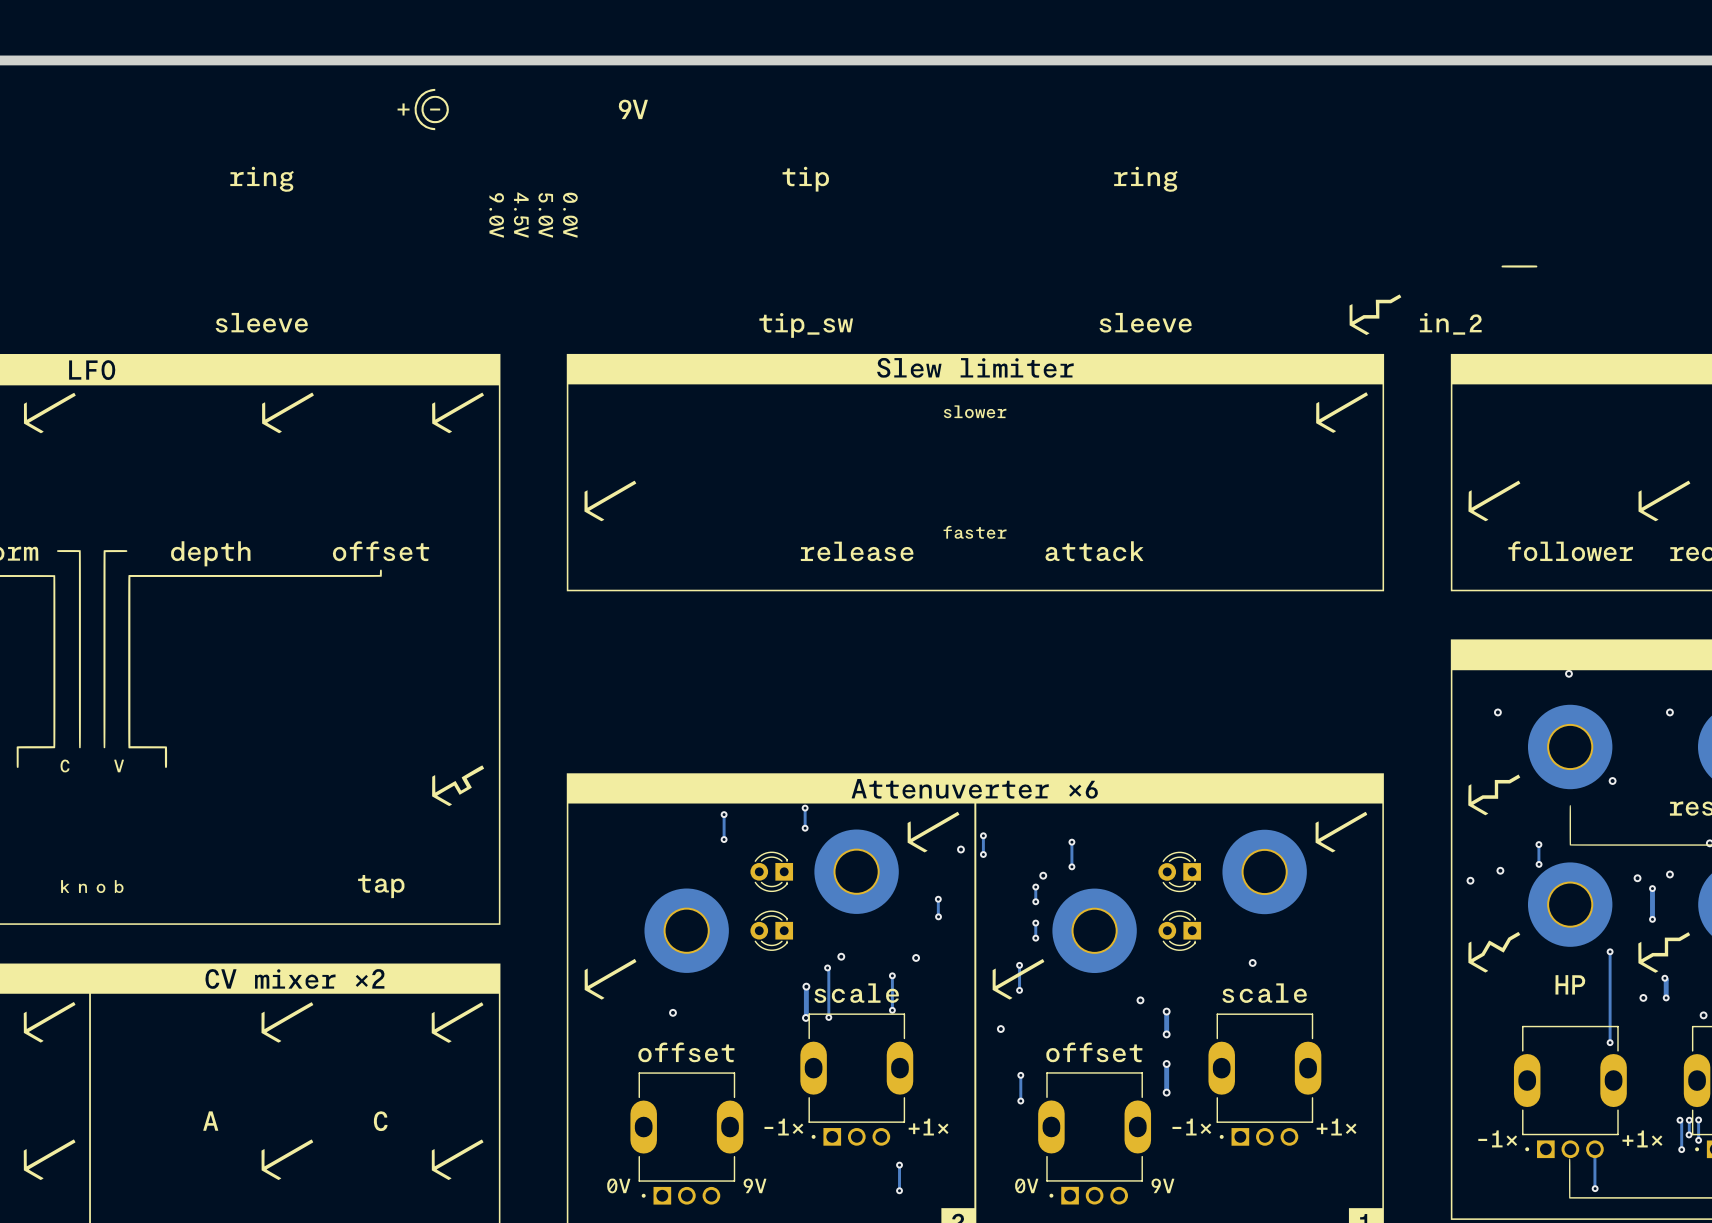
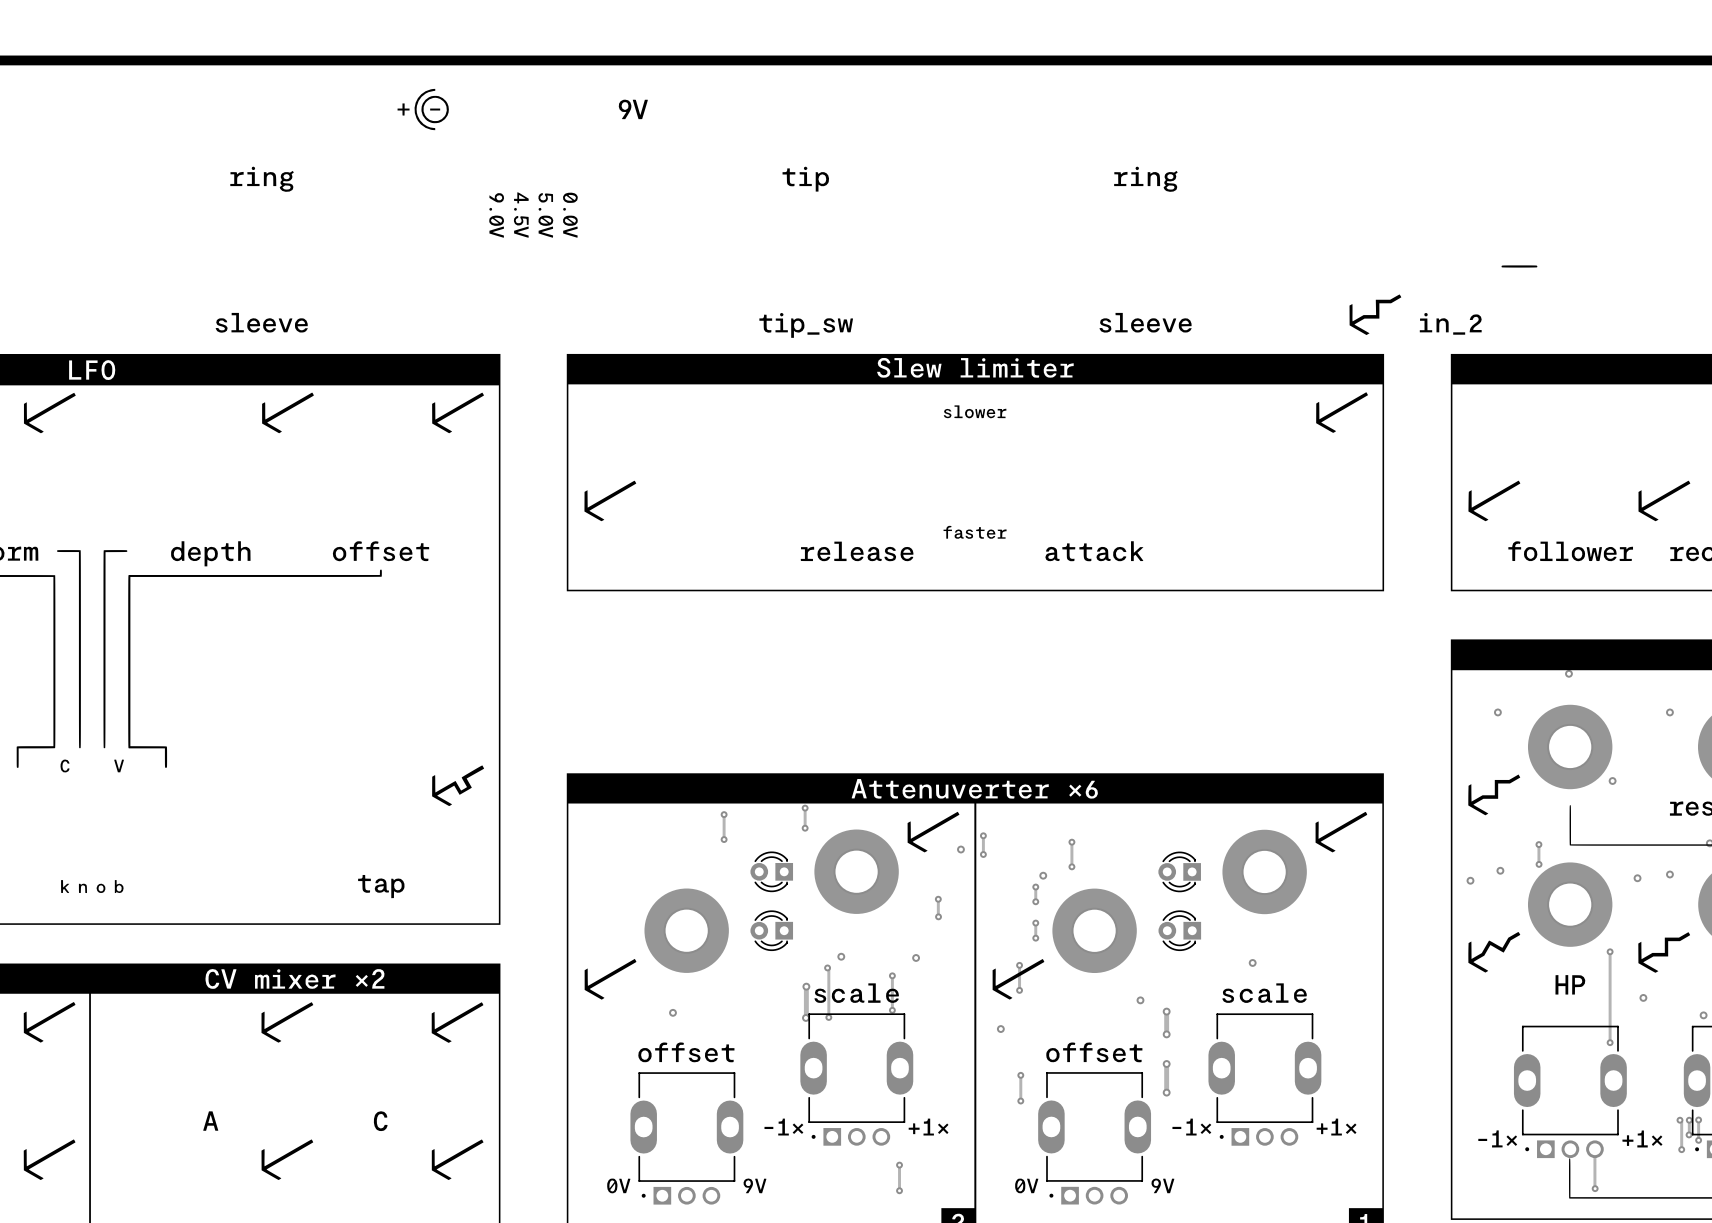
track: (1652, 888) (1652, 919) -> none
via: (1652, 888) -> none
via: (1652, 919) -> none
track: (1664, 978) (1666, 997) -> none
via: (1664, 978) -> none
via: (1666, 997) -> none

